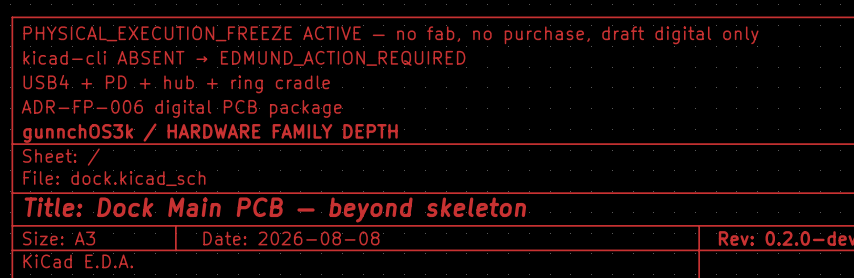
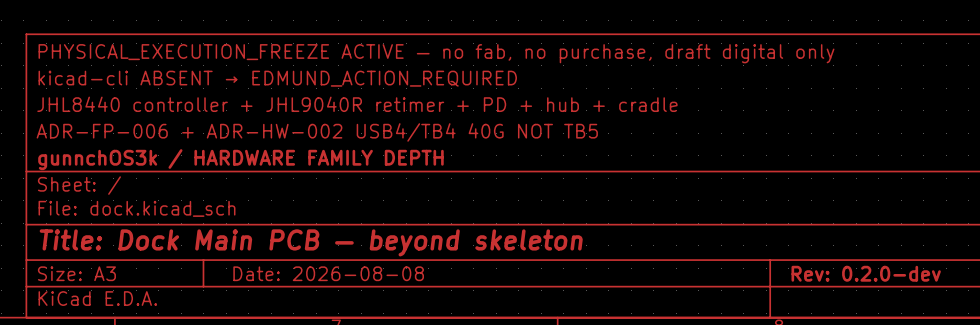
title block: USB4 + PD + hub + ring cradle (176, 84) -> JHL8440 controller + JHL9040R retimer + PD + hub + cradle (357, 104)
title block: ADR-FP-006 digital PCB package (181, 108) -> ADR-FP-006 + ADR-HW-002 USB4/TB4 40G NOT TB5 (317, 132)

